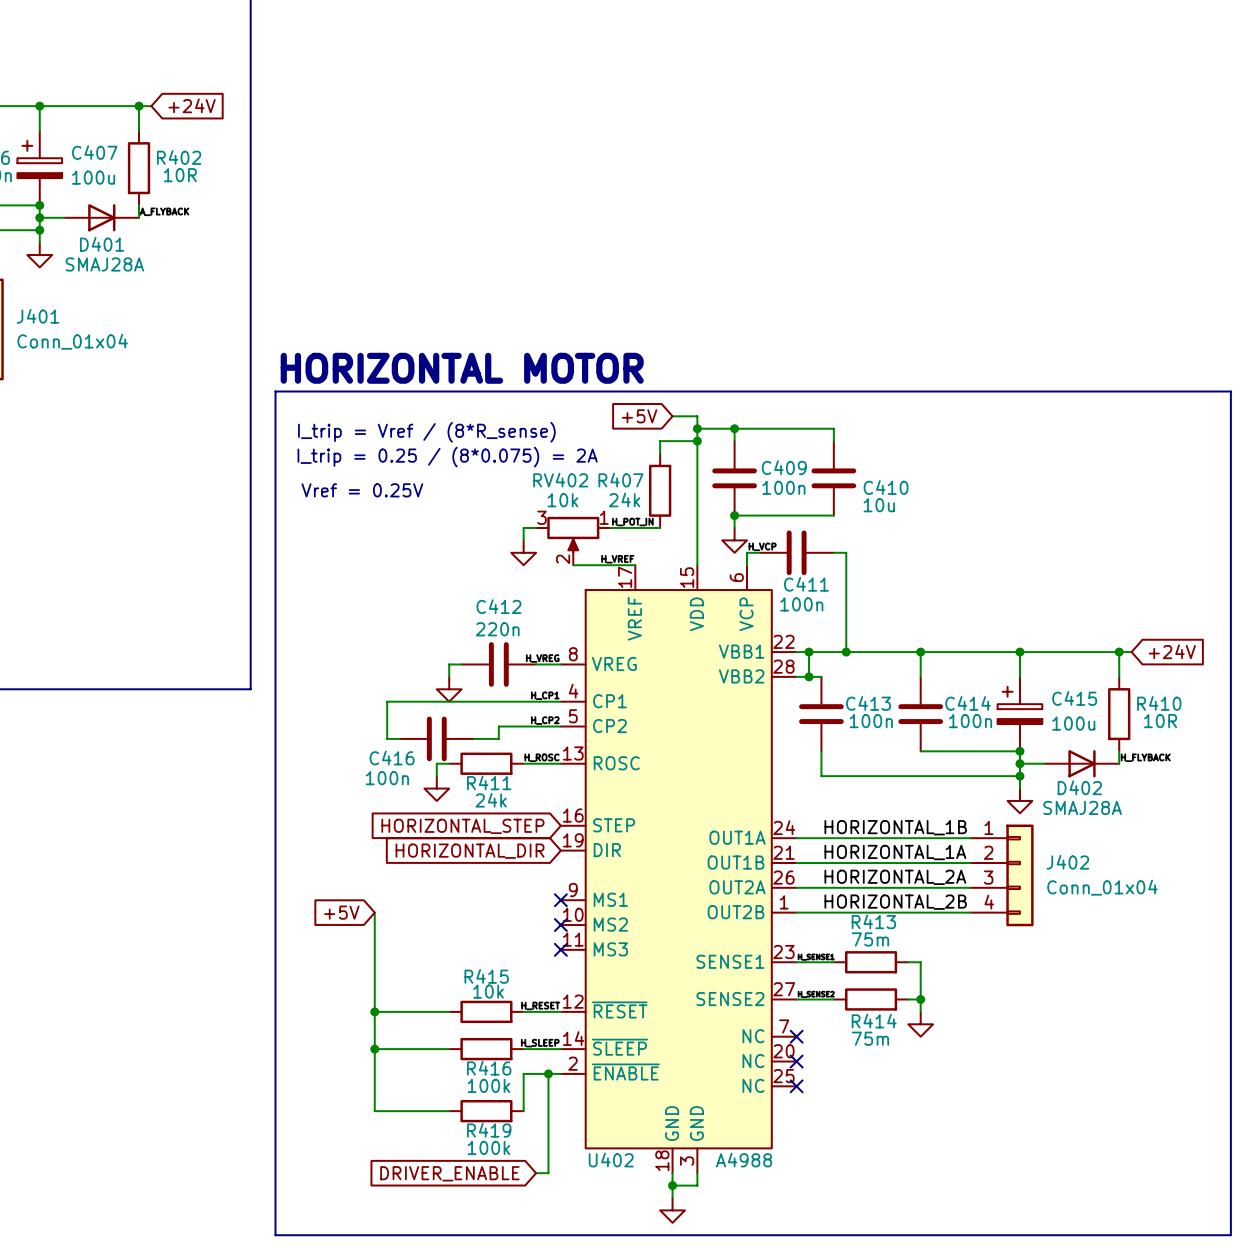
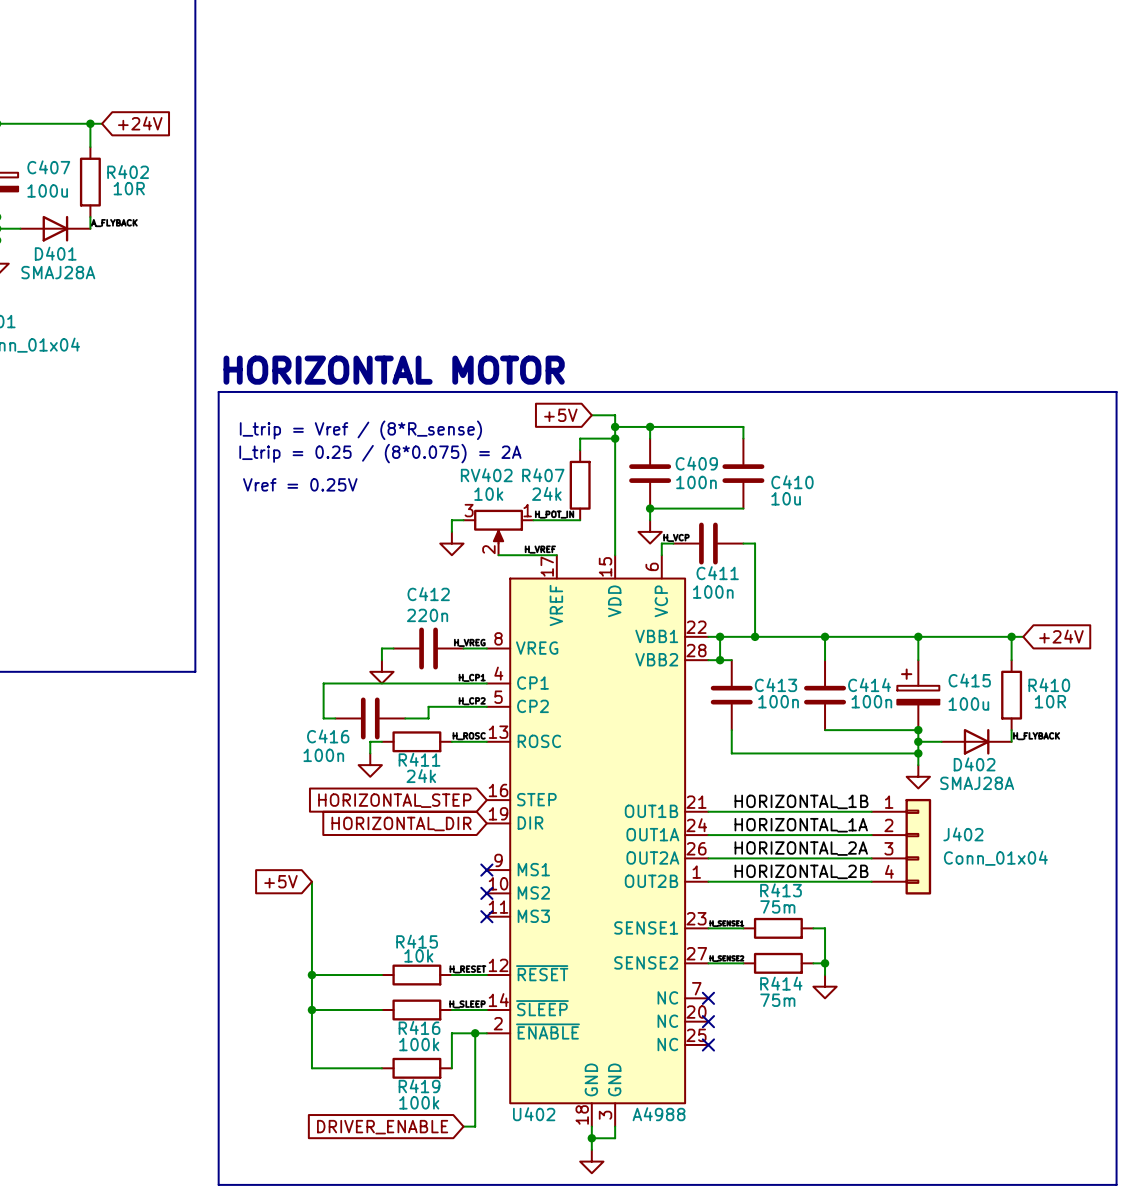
U402 pin number: 24 (784, 827) -> 21 (696, 802)
U402 pin name: OUT1A (737, 837) -> OUT1B (651, 811)
U402 pin number: 21 (783, 852) -> 24 (696, 825)
U402 pin name: OUT1B (736, 862) -> OUT1A (652, 834)

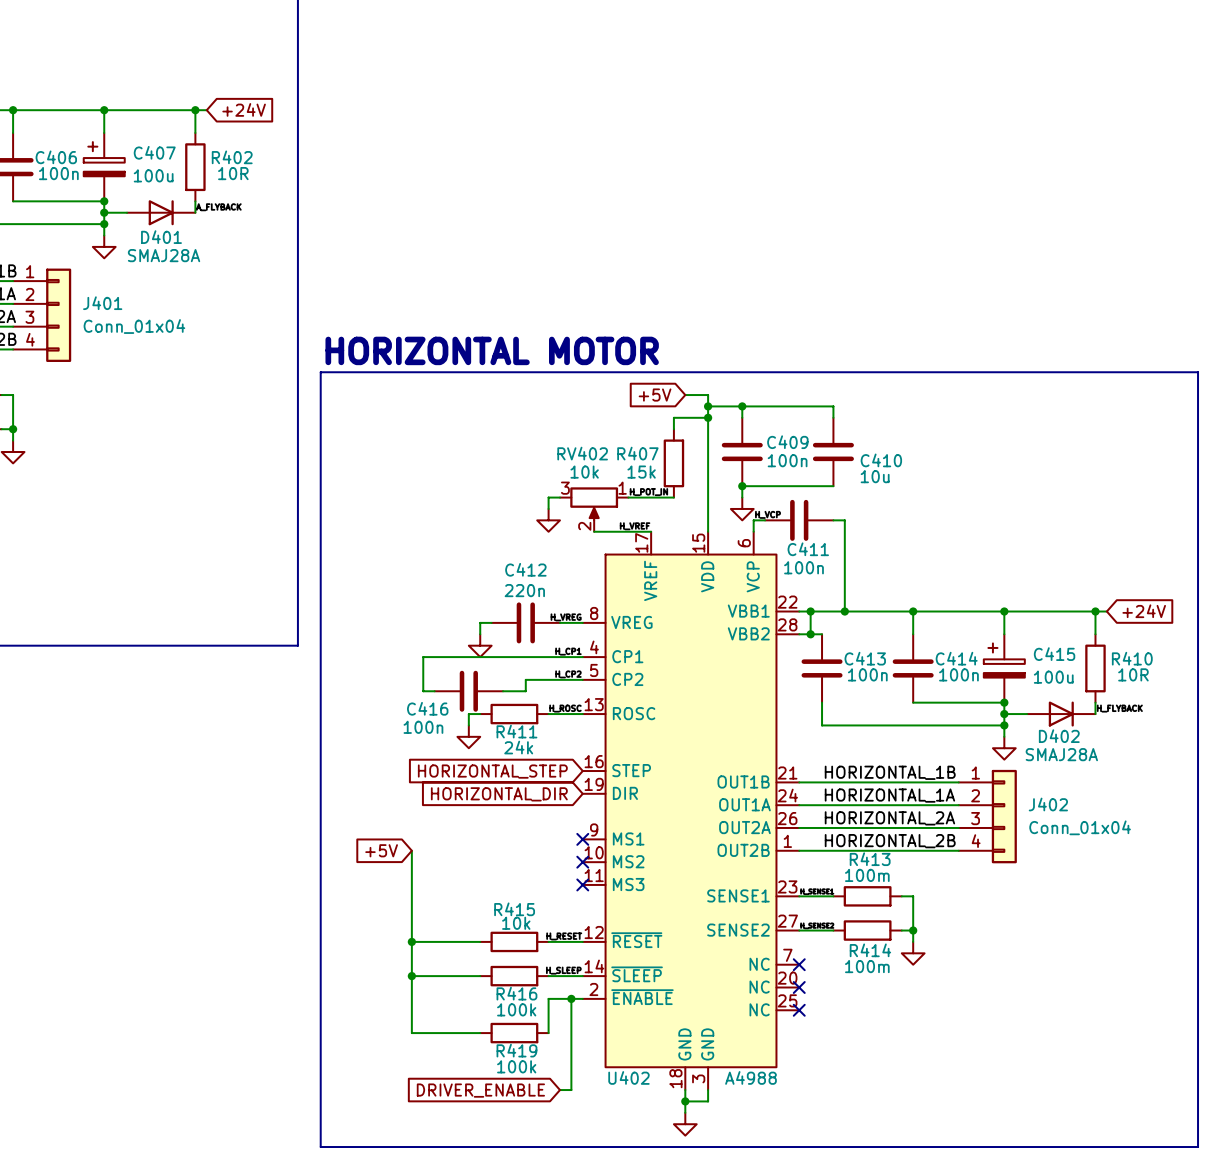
text: I_trip = Vref / (8*R_sense) (360, 430) -> none
text: I_trip = 0.25 / (8*0.075) = 2A (380, 453) -> none
text: Vref = 0.25V (300, 484) -> none
R407 value: 24k (546, 493) -> 15k (641, 472)
R413 value: 75m (777, 906) -> 100m (867, 875)
R414 value: 75m (777, 1000) -> 100m (867, 966)

